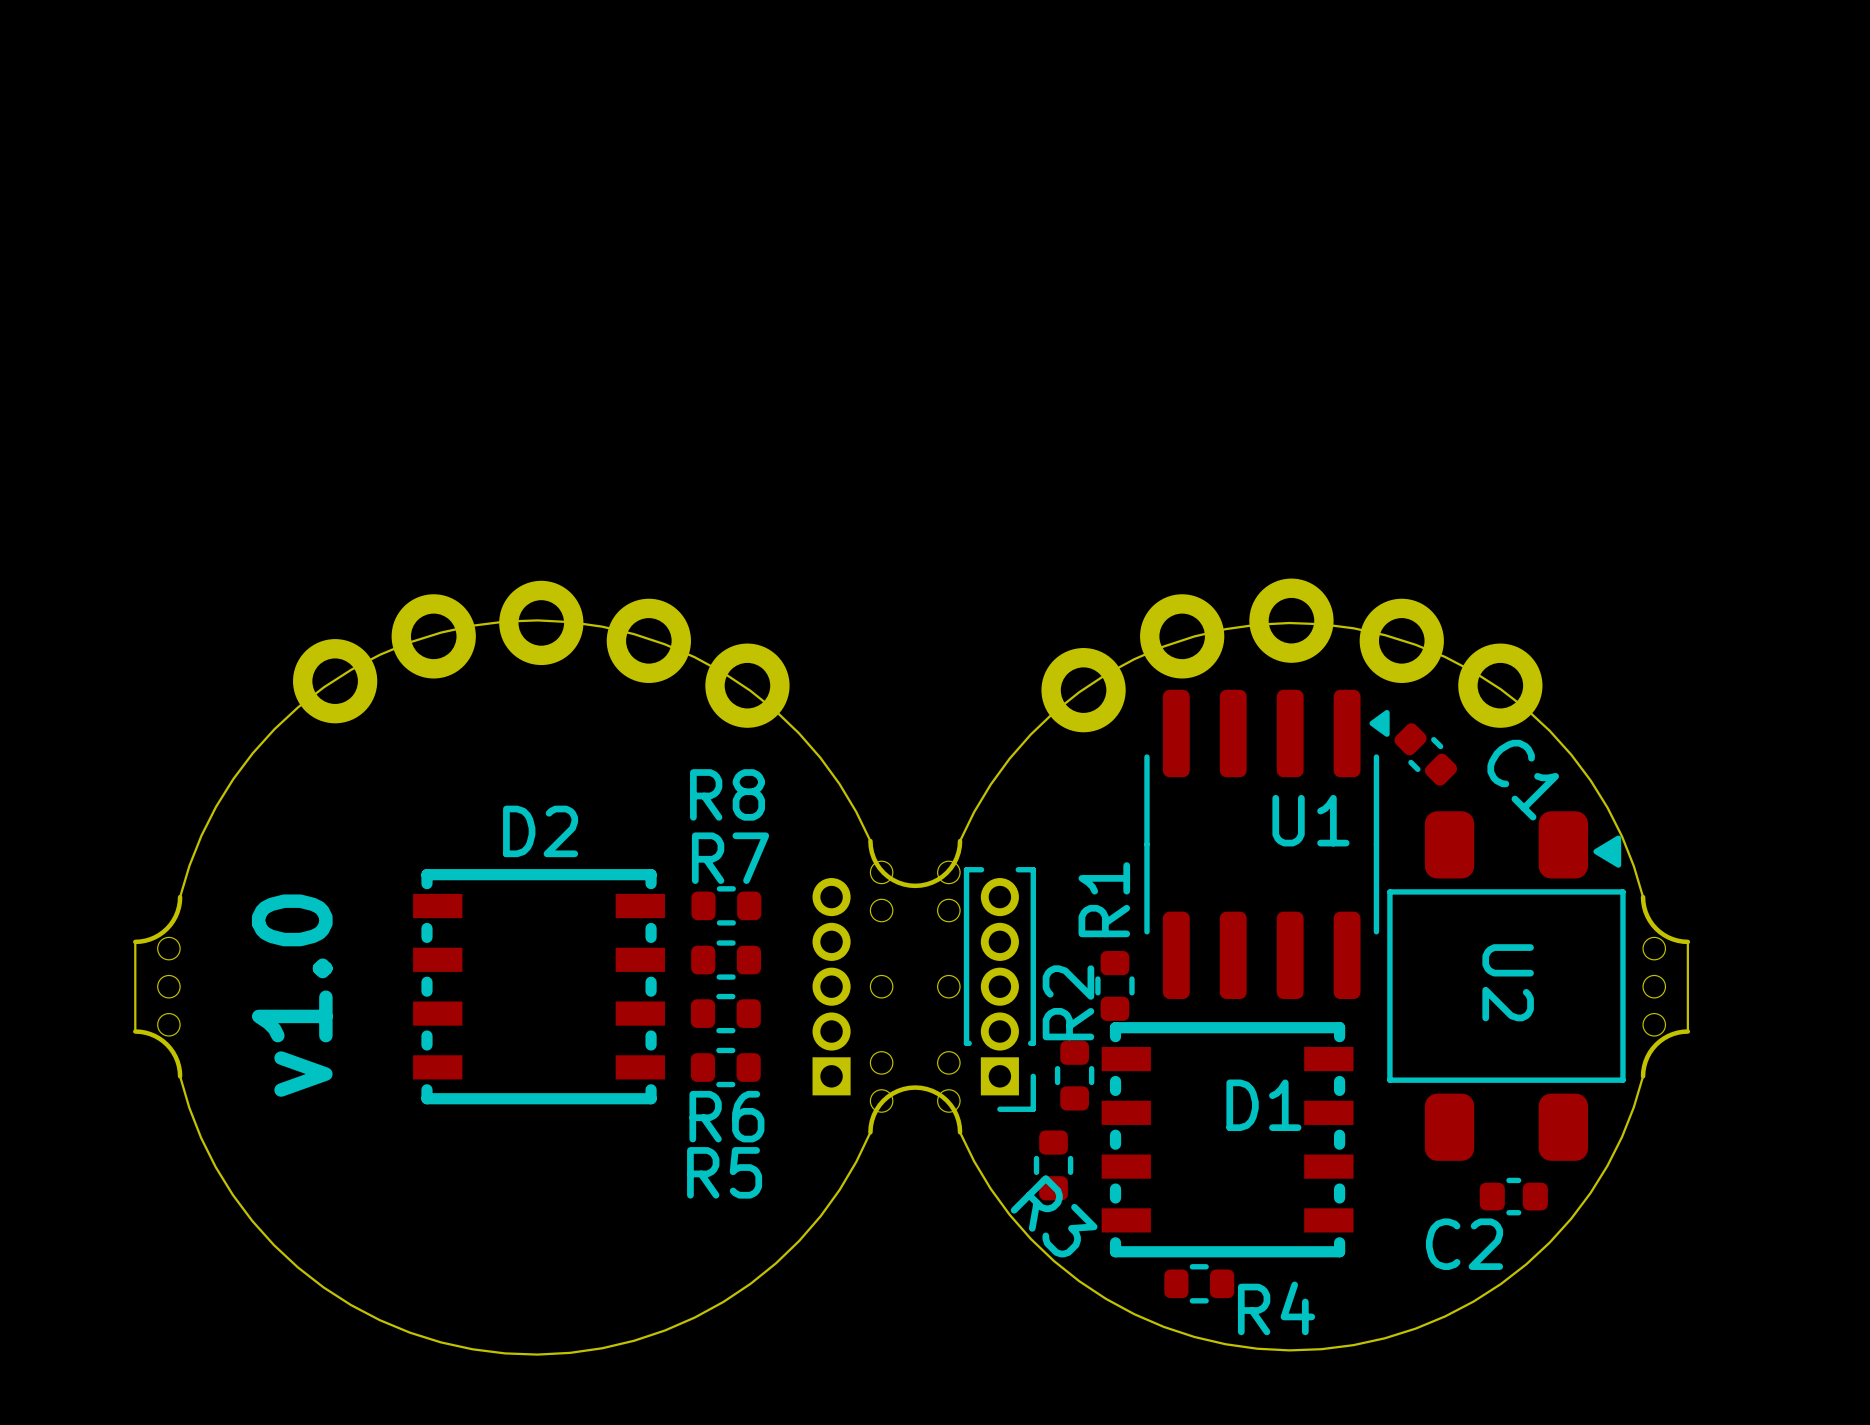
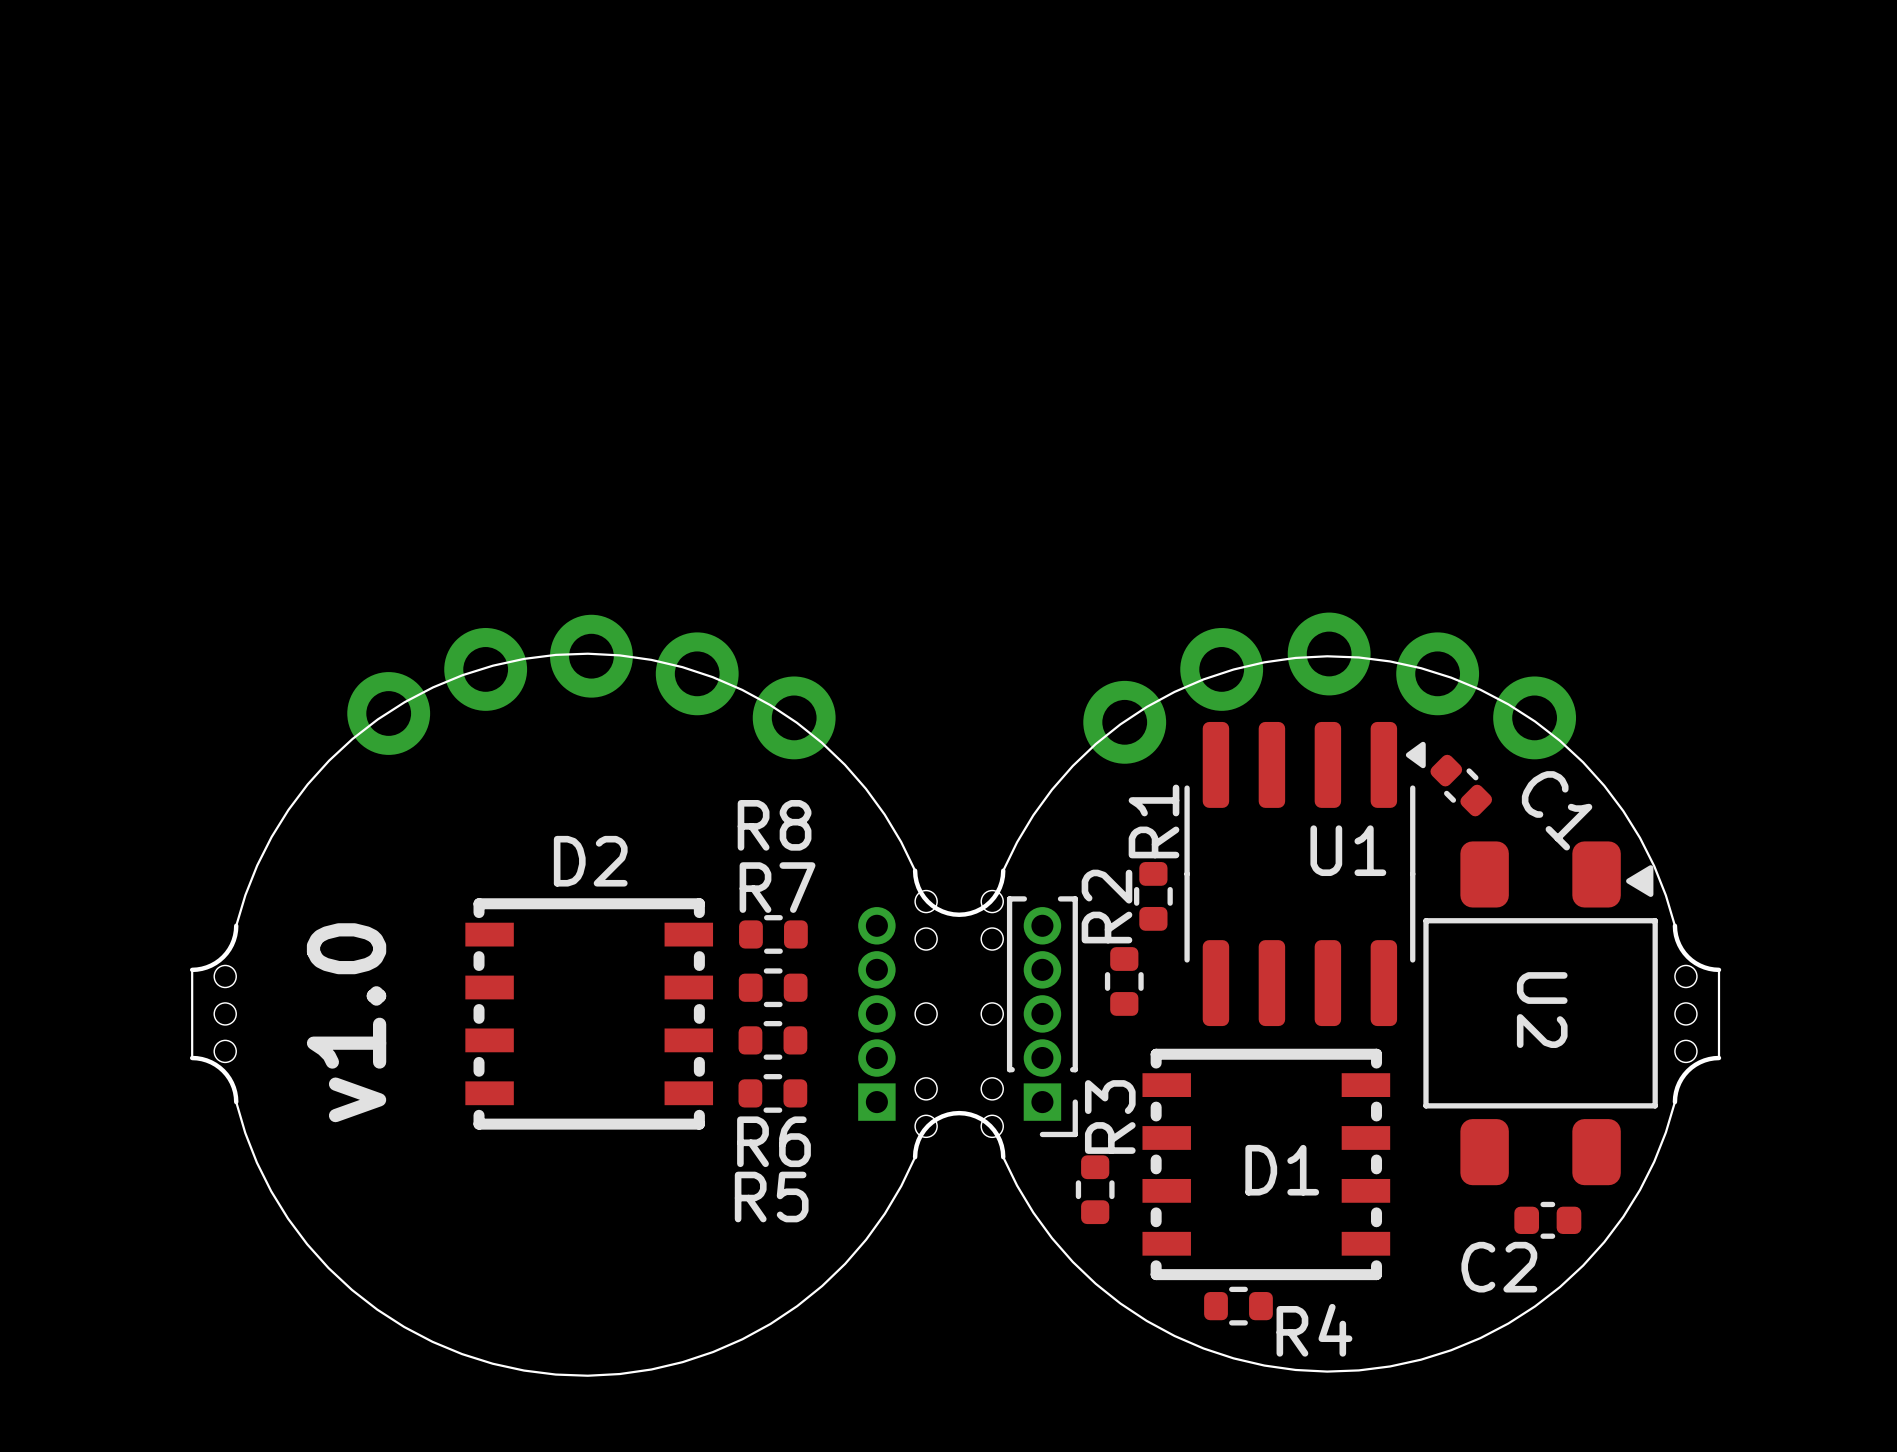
R1 name position: R1 (1104, 899) -> R1 (1154, 821)
R1 position: (1114, 985) -> (1153, 896)
R2 name position: R2 (1068, 1002) -> R2 (1106, 906)
R2 position: (1074, 1075) -> (1124, 981)
D1 name position: D1 (1263, 1105) -> D1 (1282, 1170)
R3 name rotation: 0° (1054, 1216) -> 135° counterclockwise (1110, 1117)

